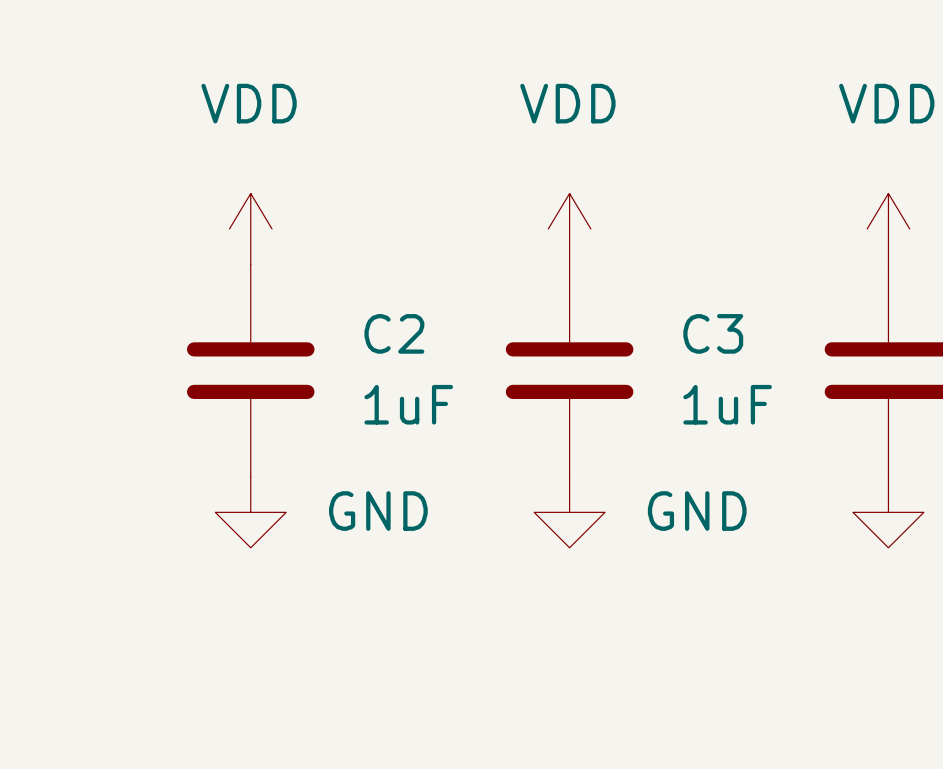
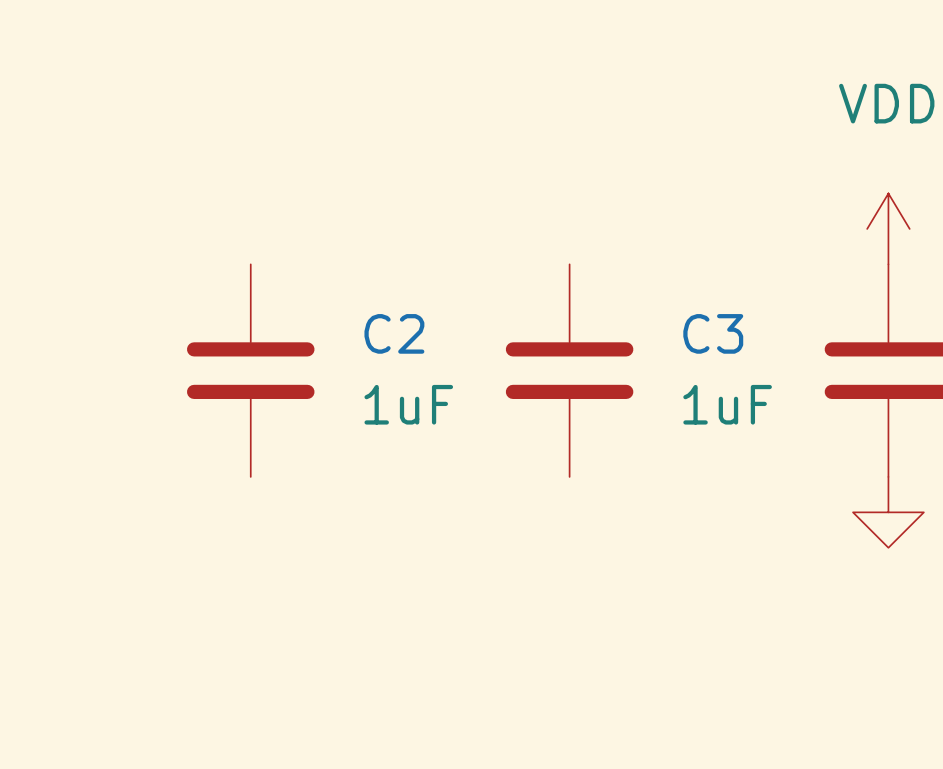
power symbol: VDD (250, 228) -> none
power symbol: VDD (569, 228) -> none
power symbol: GND (250, 512) -> none
power symbol: GND (569, 512) -> none

